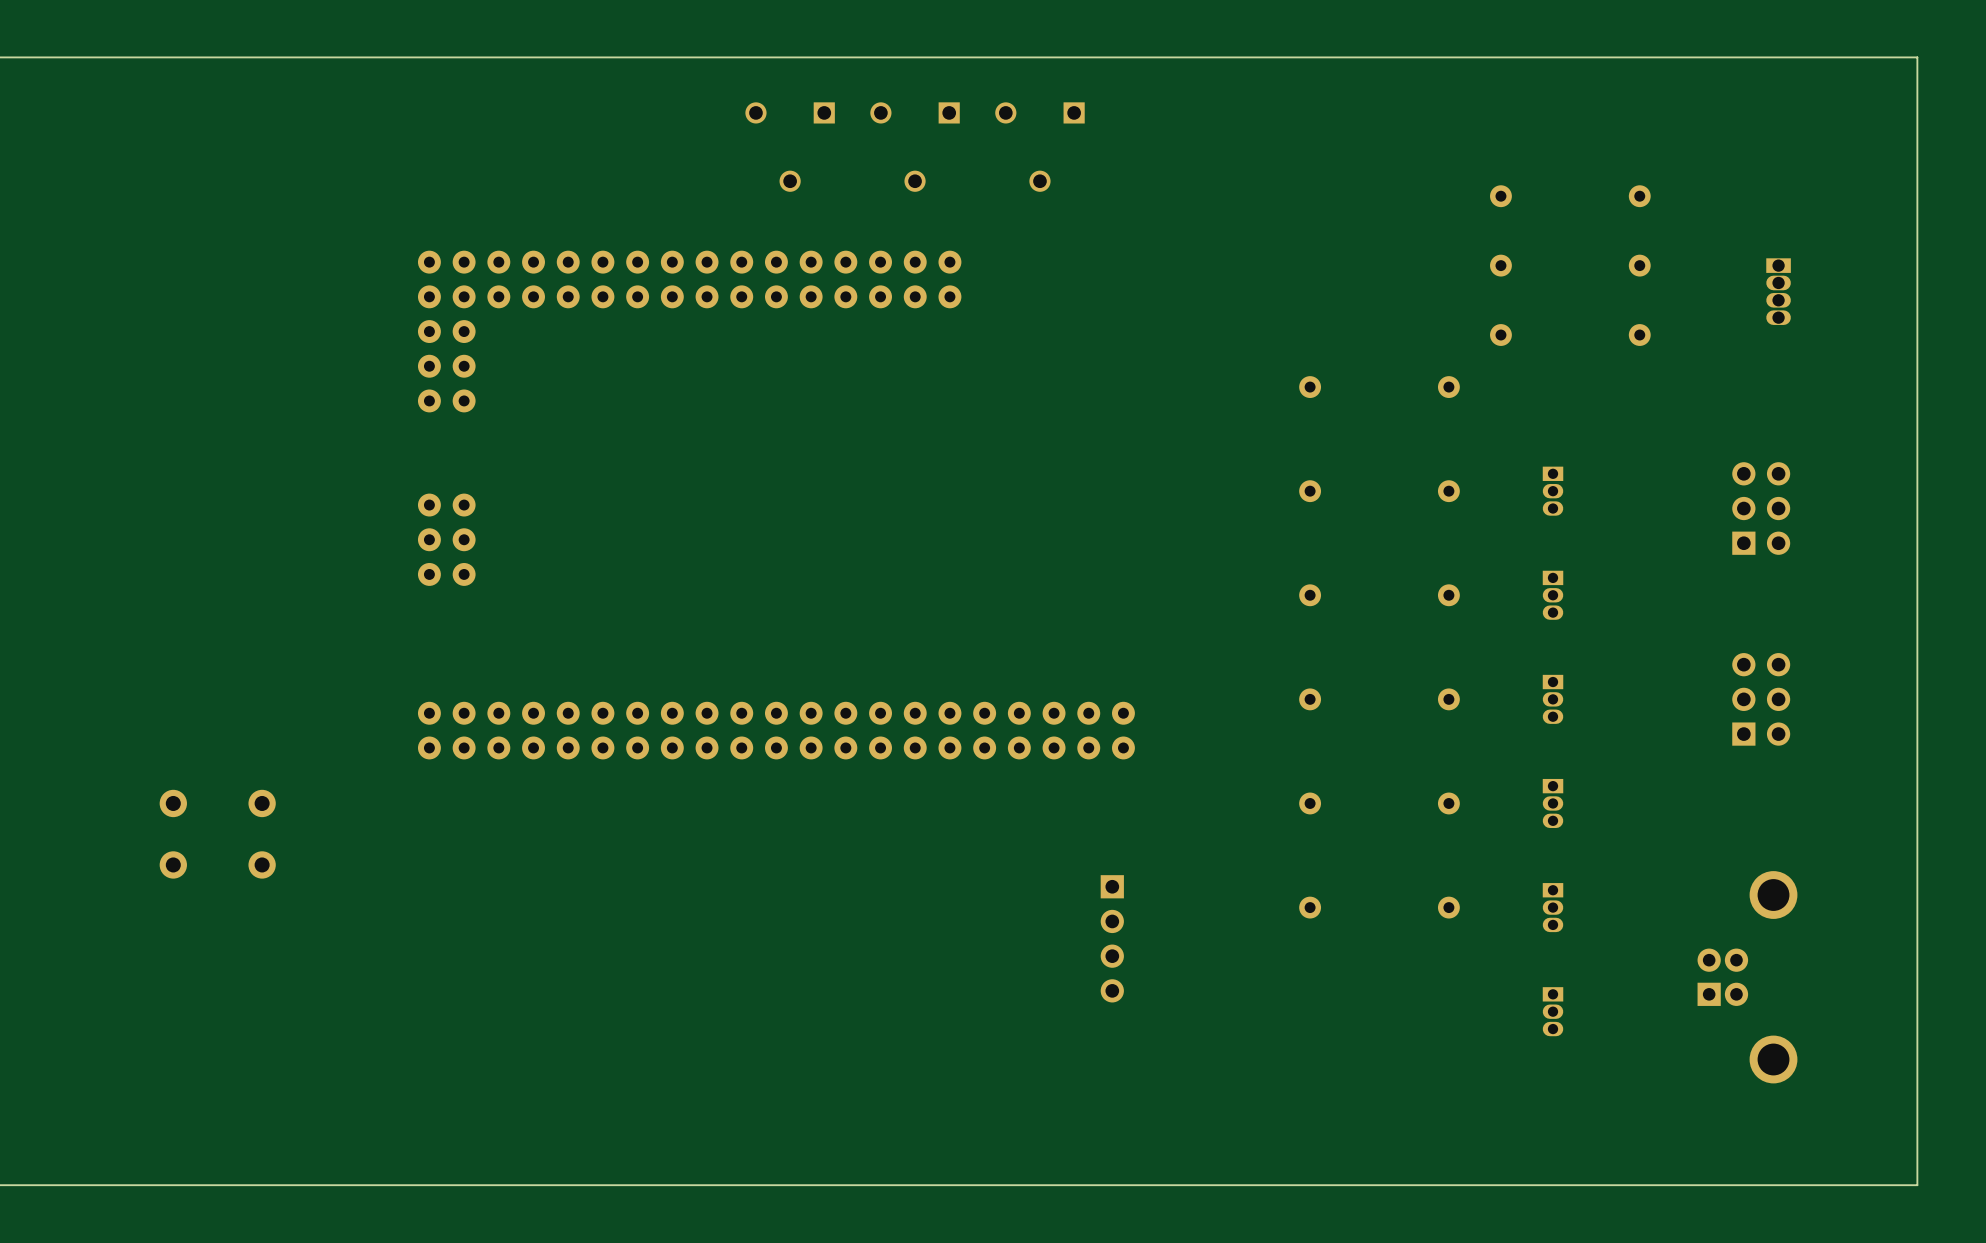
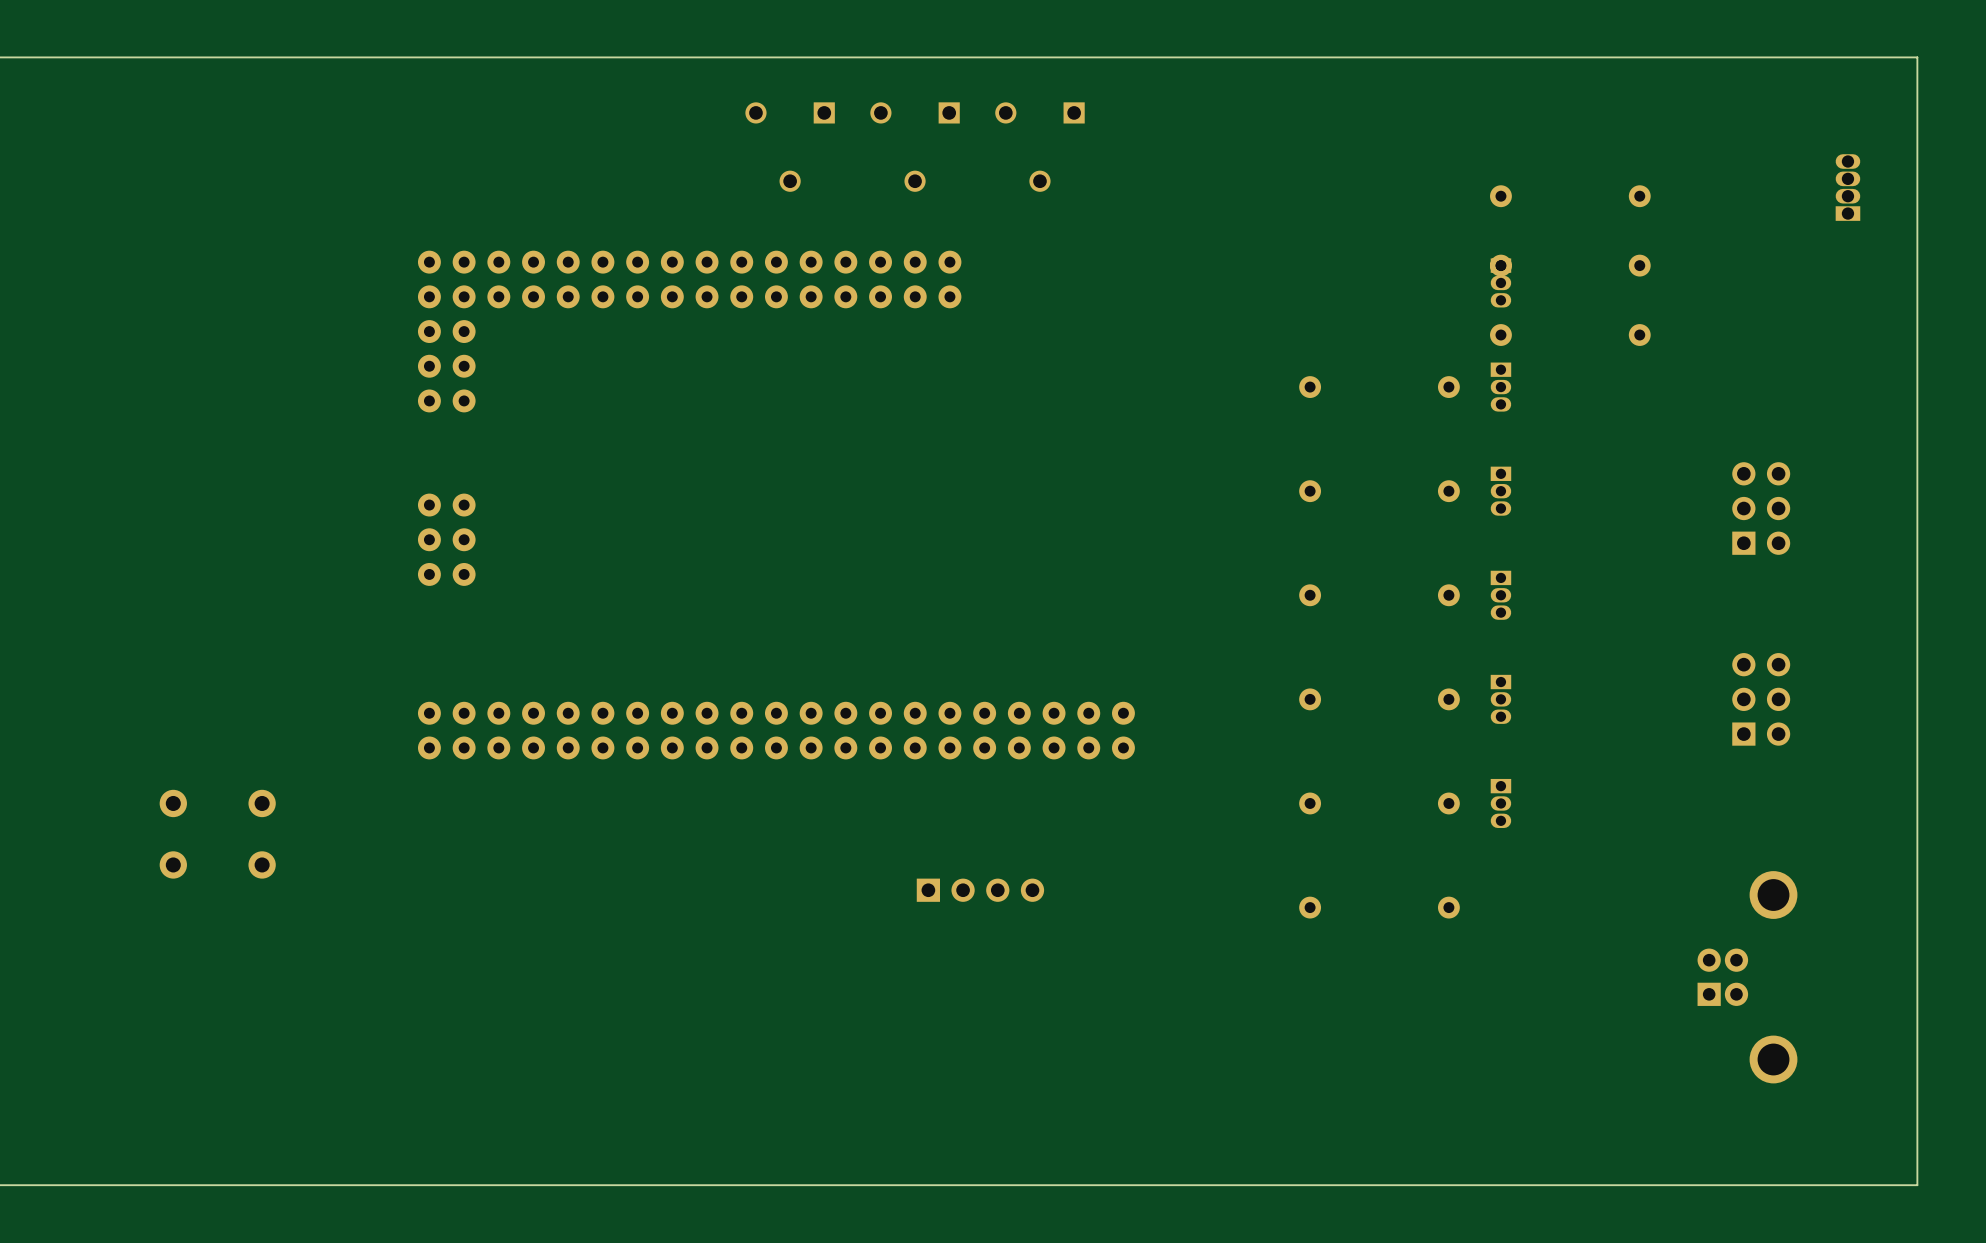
part: none -> (1500, 282)
part rotation: 0° (1778, 291) -> 180° (1847, 187)
part position: (1778, 291) -> (1847, 187)
part: none -> (1500, 387)
part position: (1553, 491) -> (1500, 491)
part position: (1553, 595) -> (1500, 595)
part position: (1553, 699) -> (1500, 699)
part position: (1553, 803) -> (1500, 803)
part: (1553, 907) -> none
part rotation: 0° (1112, 938) -> 90° counterclockwise (980, 890)
part position: (1112, 938) -> (980, 890)
part: (1553, 1011) -> none

